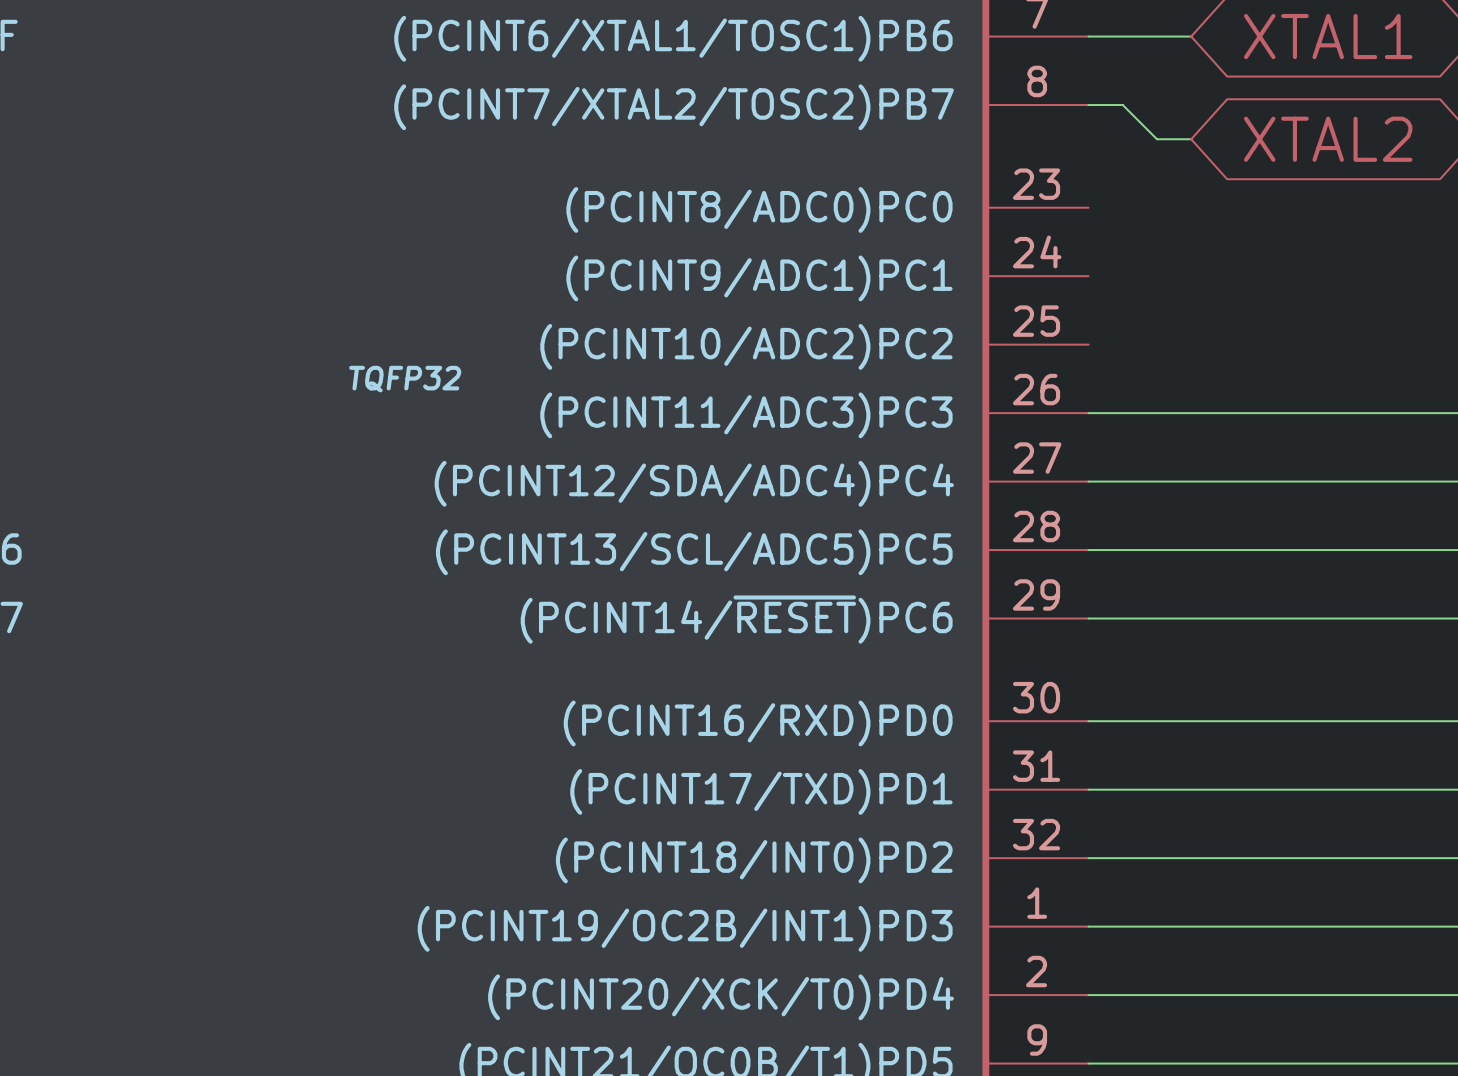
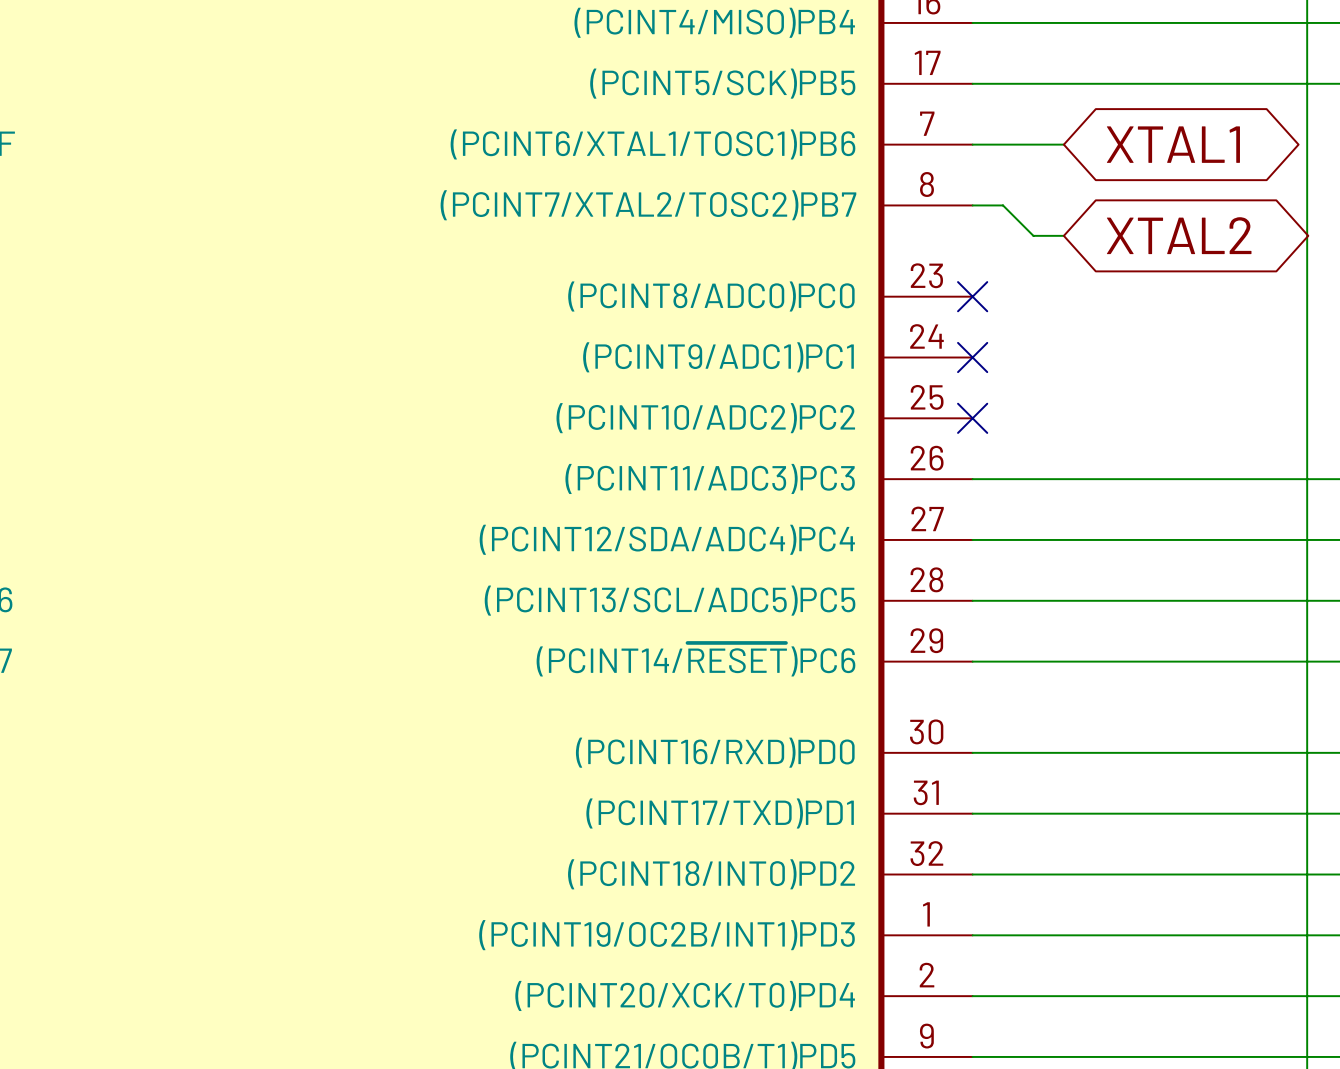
no-connect mark: none -> (972, 296)
no-connect mark: none -> (972, 357)
no-connect mark: none -> (972, 418)
part text: TQFP32 (405, 379) -> none

